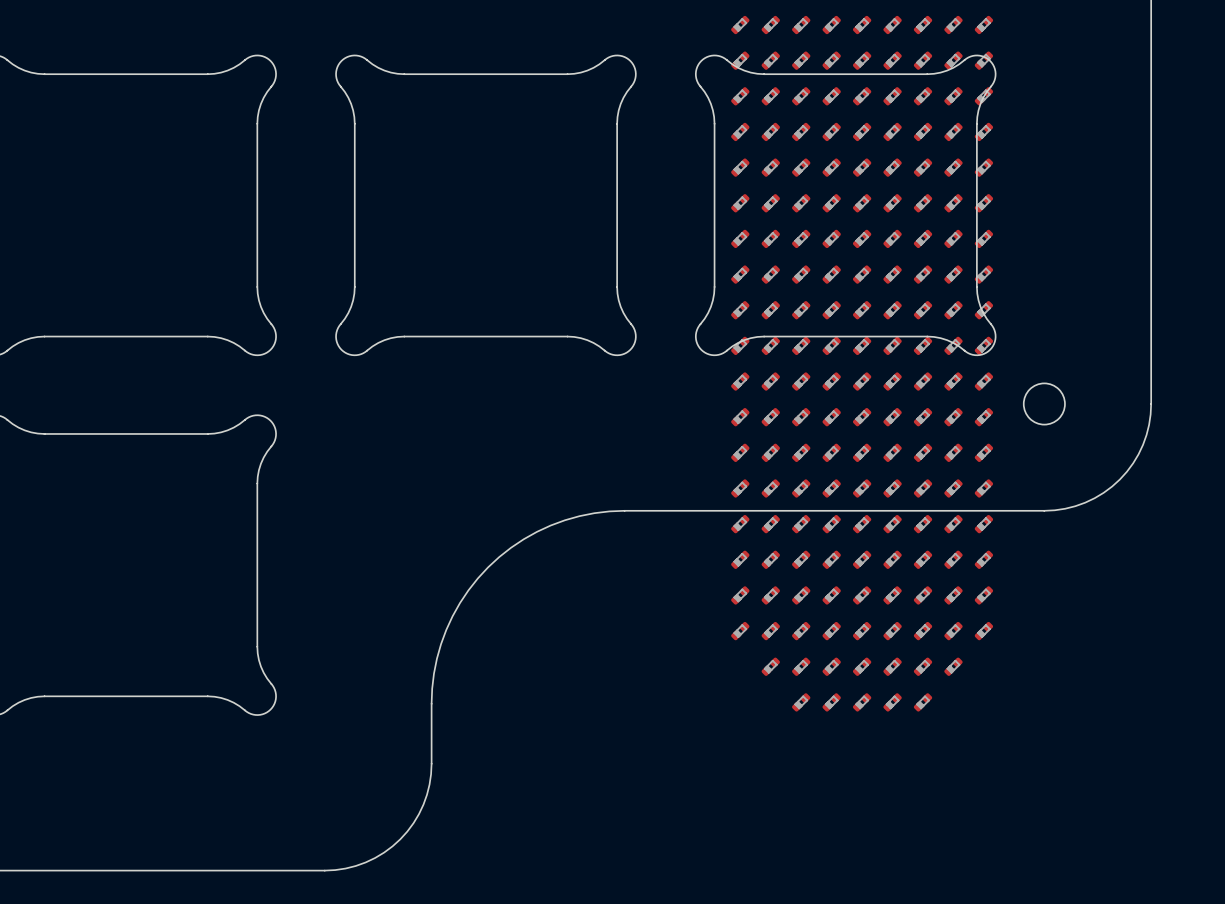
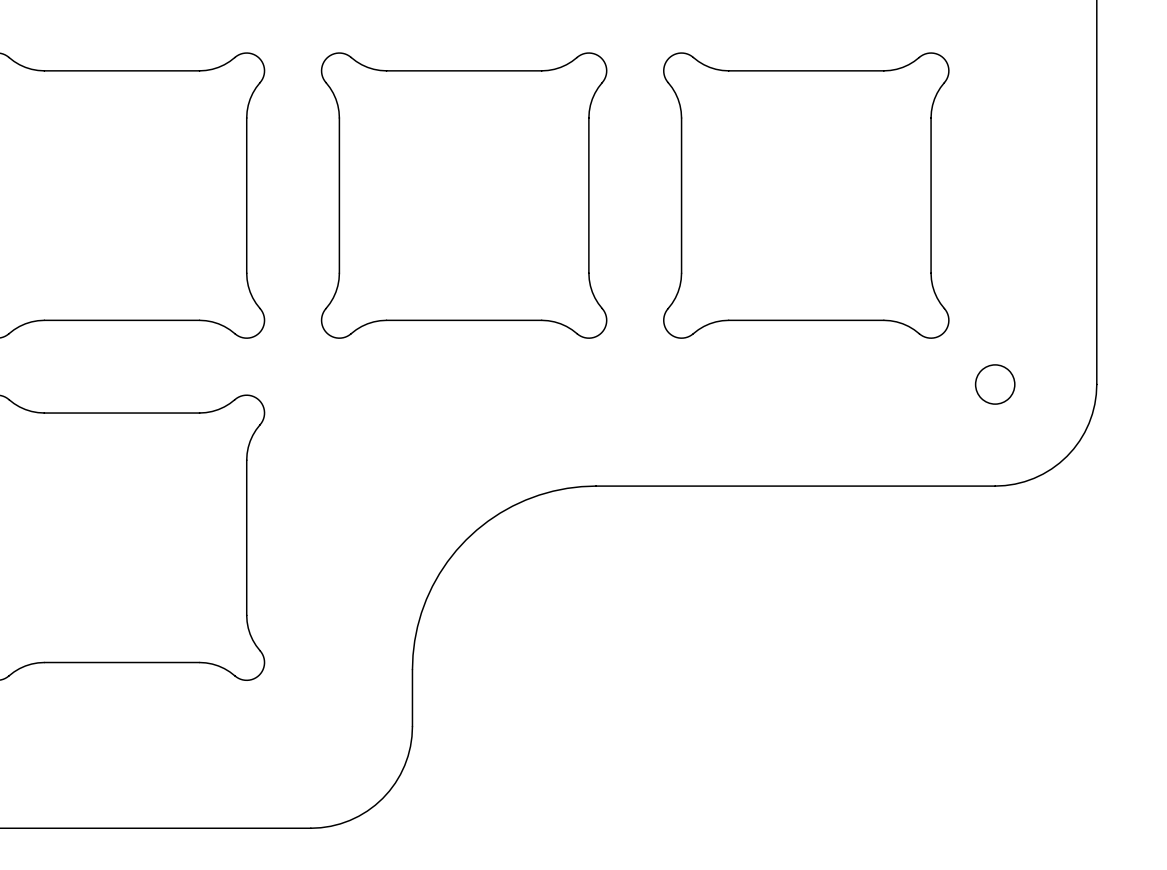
part: (740, 25) -> none
part: (770, 25) -> none
part: (801, 25) -> none
part: (831, 25) -> none
part: (862, 25) -> none
part: (892, 25) -> none
part: (923, 25) -> none
part: (953, 25) -> none
part: (983, 25) -> none
part: (740, 60) -> none
part: (770, 60) -> none
part: (801, 60) -> none
part: (831, 60) -> none
part: (862, 60) -> none
part: (892, 60) -> none
part: (923, 60) -> none
part: (953, 60) -> none
part: (983, 60) -> none
part: (740, 96) -> none
part: (770, 96) -> none
part: (801, 96) -> none
part: (831, 96) -> none
part: (862, 96) -> none
part: (892, 96) -> none
part: (923, 96) -> none
part: (953, 96) -> none
part: (983, 96) -> none
part: (740, 131) -> none
part: (770, 131) -> none
part: (801, 131) -> none
part: (831, 131) -> none
part: (862, 131) -> none
part: (892, 131) -> none
part: (923, 131) -> none
part: (953, 131) -> none
part: (983, 131) -> none
part: (740, 167) -> none
part: (770, 167) -> none
part: (801, 167) -> none
part: (831, 167) -> none
part: (862, 167) -> none
part: (892, 167) -> none
part: (923, 167) -> none
part: (953, 167) -> none
part: (983, 167) -> none
part: (740, 203) -> none
part: (770, 203) -> none
part: (801, 203) -> none
part: (831, 203) -> none
part: (862, 203) -> none
part: (892, 203) -> none
part: (923, 203) -> none
part: (953, 203) -> none
part: (983, 203) -> none
part: (740, 238) -> none
part: (770, 238) -> none
part: (801, 238) -> none
part: (831, 238) -> none
part: (862, 238) -> none
part: (892, 238) -> none
part: (923, 238) -> none
part: (953, 238) -> none
part: (983, 238) -> none
part: (740, 274) -> none
part: (770, 274) -> none
part: (801, 274) -> none
part: (831, 274) -> none
part: (862, 274) -> none
part: (892, 274) -> none
part: (923, 274) -> none
part: (953, 274) -> none
part: (983, 274) -> none
part: (740, 310) -> none
part: (770, 310) -> none
part: (801, 310) -> none
part: (831, 310) -> none
part: (862, 310) -> none
part: (892, 310) -> none
part: (923, 310) -> none
part: (953, 310) -> none
part: (983, 310) -> none
part: (740, 345) -> none
part: (770, 345) -> none
part: (801, 345) -> none
part: (831, 345) -> none
part: (862, 345) -> none
part: (892, 345) -> none
part: (923, 345) -> none
part: (953, 345) -> none
part: (983, 345) -> none
part: (740, 381) -> none
part: (770, 381) -> none
part: (801, 381) -> none
part: (831, 381) -> none
part: (862, 381) -> none
part: (892, 381) -> none
part: (923, 381) -> none
part: (953, 381) -> none
part: (983, 381) -> none
part: (740, 417) -> none
part: (770, 417) -> none
part: (801, 417) -> none
part: (831, 417) -> none
part: (862, 417) -> none
part: (892, 417) -> none
part: (923, 417) -> none
part: (953, 417) -> none
part: (983, 417) -> none
part: (740, 452) -> none
part: (770, 452) -> none
part: (801, 452) -> none
part: (831, 452) -> none
part: (862, 452) -> none
part: (892, 452) -> none
part: (923, 452) -> none
part: (953, 452) -> none
part: (983, 452) -> none
part: (740, 488) -> none
part: (770, 488) -> none
part: (801, 488) -> none
part: (831, 488) -> none
part: (862, 488) -> none
part: (892, 488) -> none
part: (923, 488) -> none
part: (953, 488) -> none
part: (983, 488) -> none
part: (740, 524) -> none
part: (770, 524) -> none
part: (801, 524) -> none
part: (831, 524) -> none
part: (862, 524) -> none
part: (892, 524) -> none
part: (923, 524) -> none
part: (953, 524) -> none
part: (983, 524) -> none
part: (740, 559) -> none
part: (770, 559) -> none
part: (801, 559) -> none
part: (831, 559) -> none
part: (862, 559) -> none
part: (892, 559) -> none
part: (923, 559) -> none
part: (953, 559) -> none
part: (983, 559) -> none
part: (740, 595) -> none
part: (770, 595) -> none
part: (801, 595) -> none
part: (831, 595) -> none
part: (862, 595) -> none
part: (892, 595) -> none
part: (923, 595) -> none
part: (953, 595) -> none
part: (983, 595) -> none
part: (740, 631) -> none
part: (770, 631) -> none
part: (801, 631) -> none
part: (831, 631) -> none
part: (862, 631) -> none
part: (892, 631) -> none
part: (923, 631) -> none
part: (953, 631) -> none
part: (983, 631) -> none
part: (770, 666) -> none
part: (801, 666) -> none
part: (831, 666) -> none
part: (862, 666) -> none
part: (892, 666) -> none
part: (923, 666) -> none
part: (953, 666) -> none
part: (801, 702) -> none
part: (831, 702) -> none
part: (862, 702) -> none
part: (892, 702) -> none
part: (923, 702) -> none

